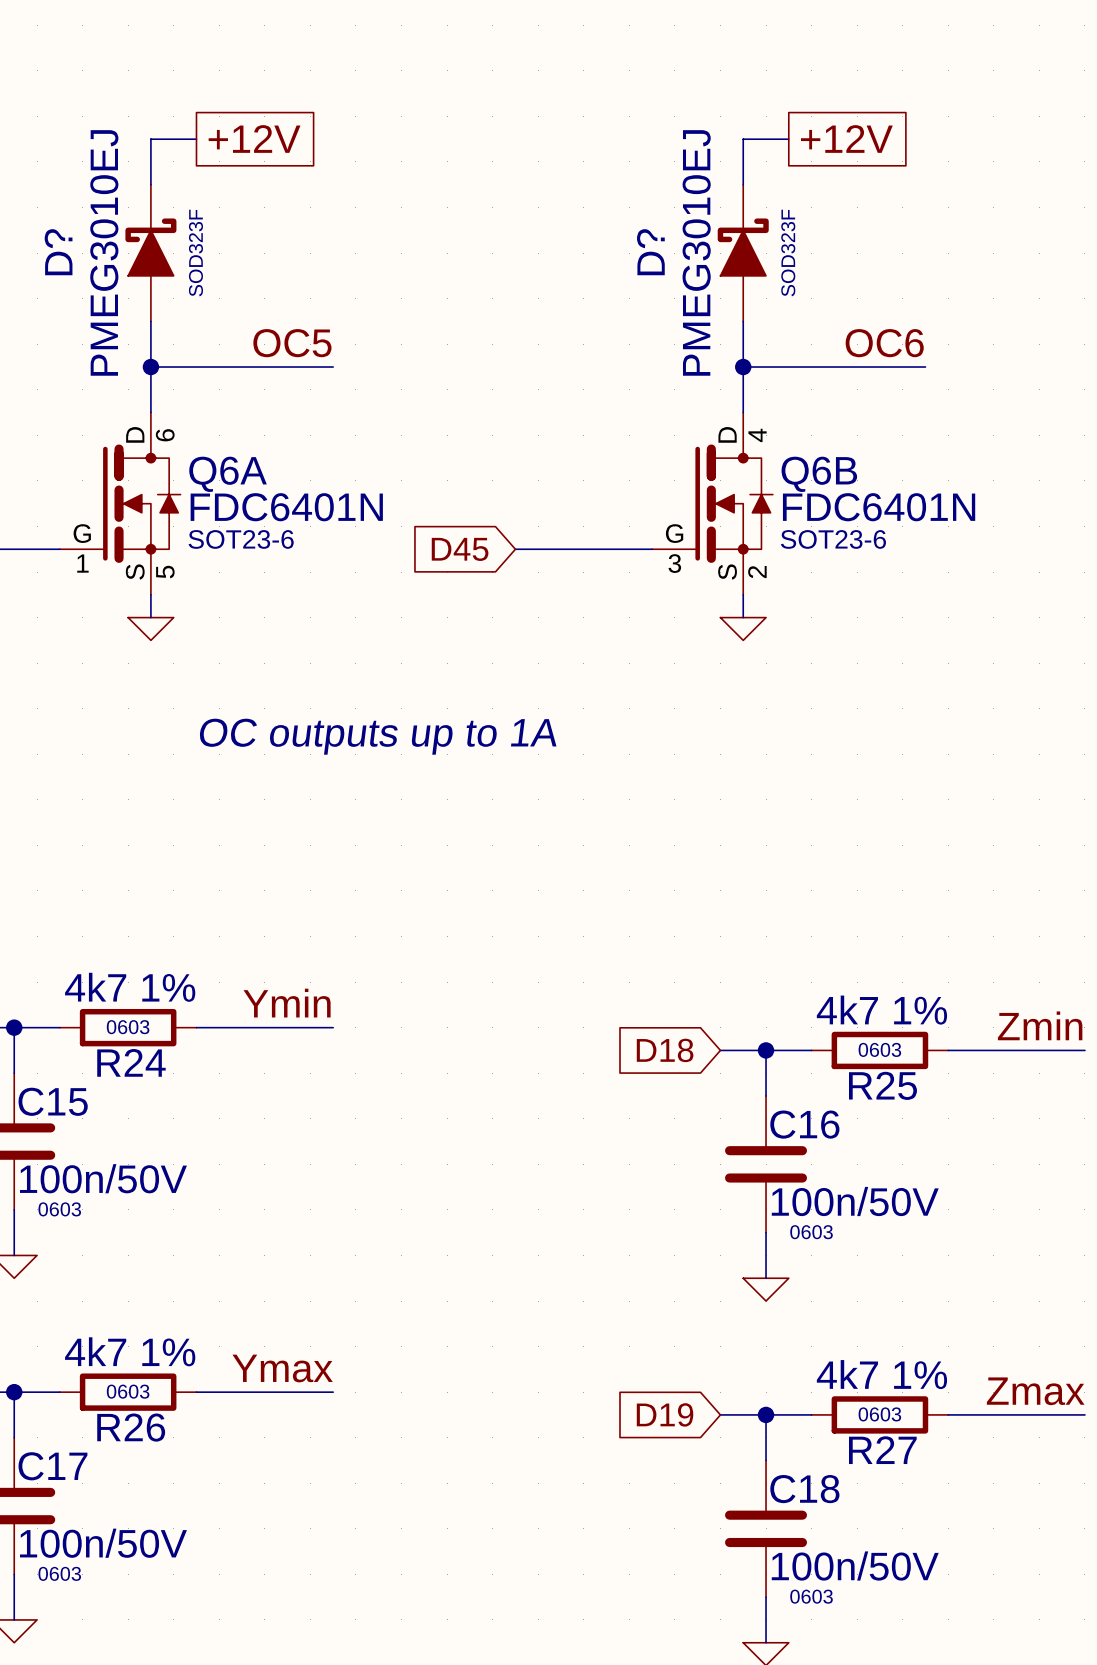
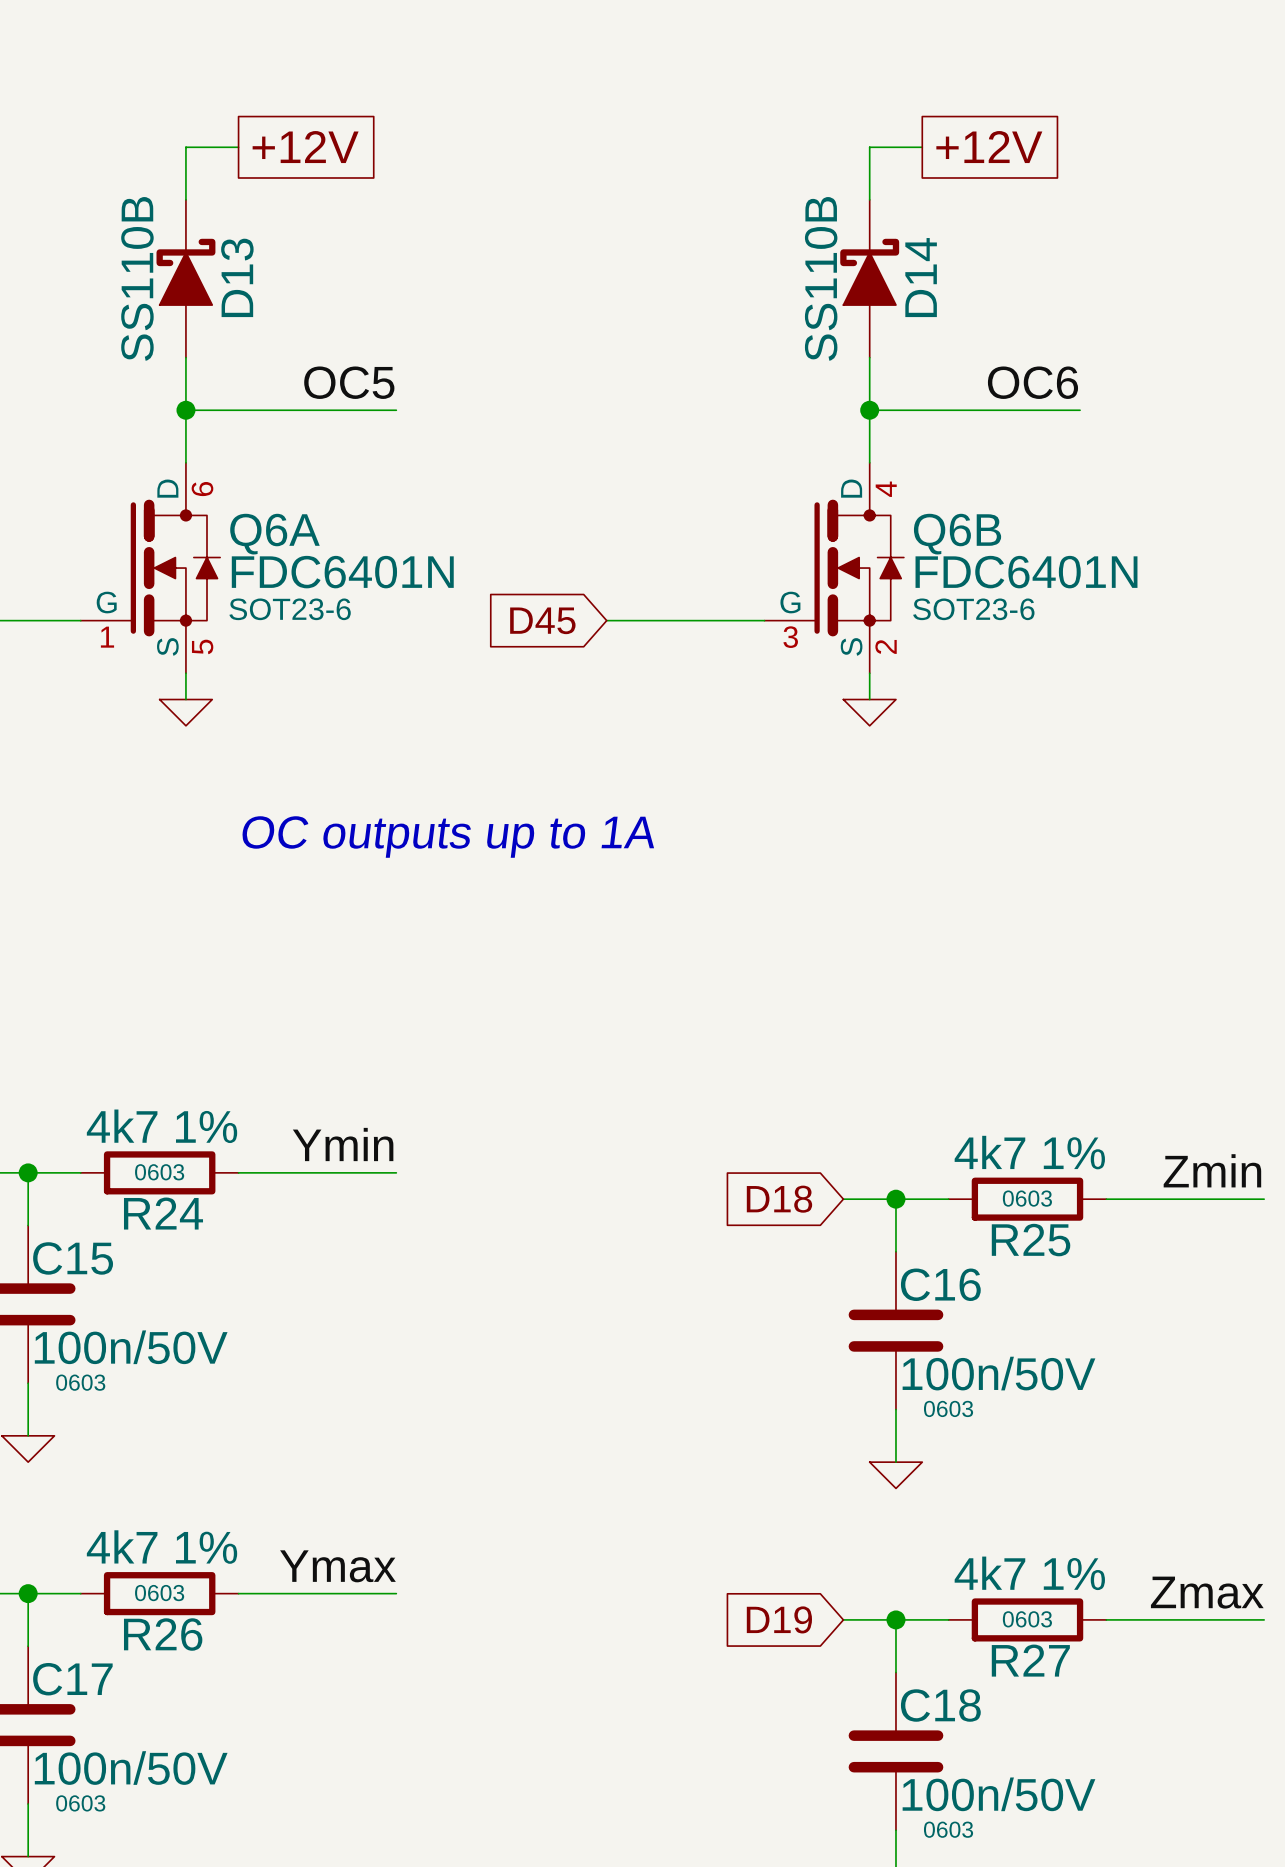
D? name: D? (58, 252) -> D13 (237, 277)
D? value: PMEG3010EJ (104, 252) -> SS110B (137, 278)
D? name: D? (650, 252) -> D14 (921, 277)
D? value: PMEG3010EJ (696, 252) -> SS110B (821, 278)
D? text: SOD323F (195, 253) -> none
D? text: SOD323F (788, 253) -> none

